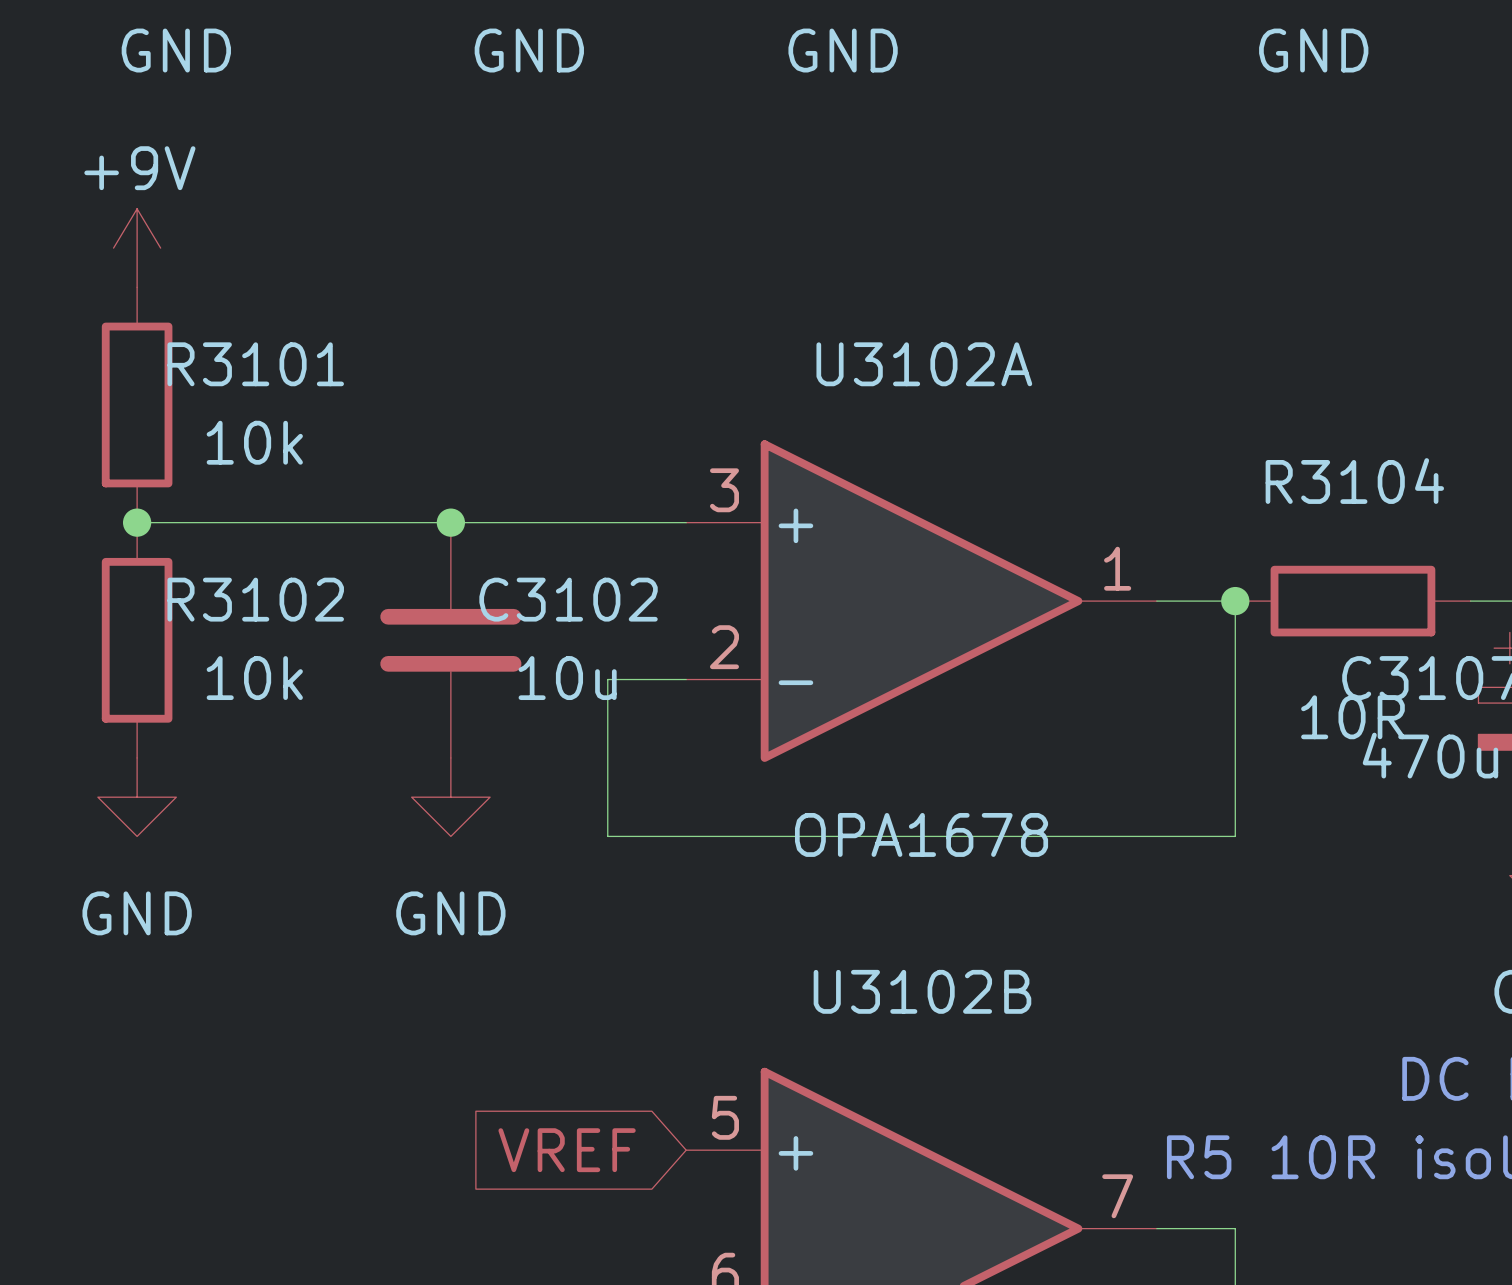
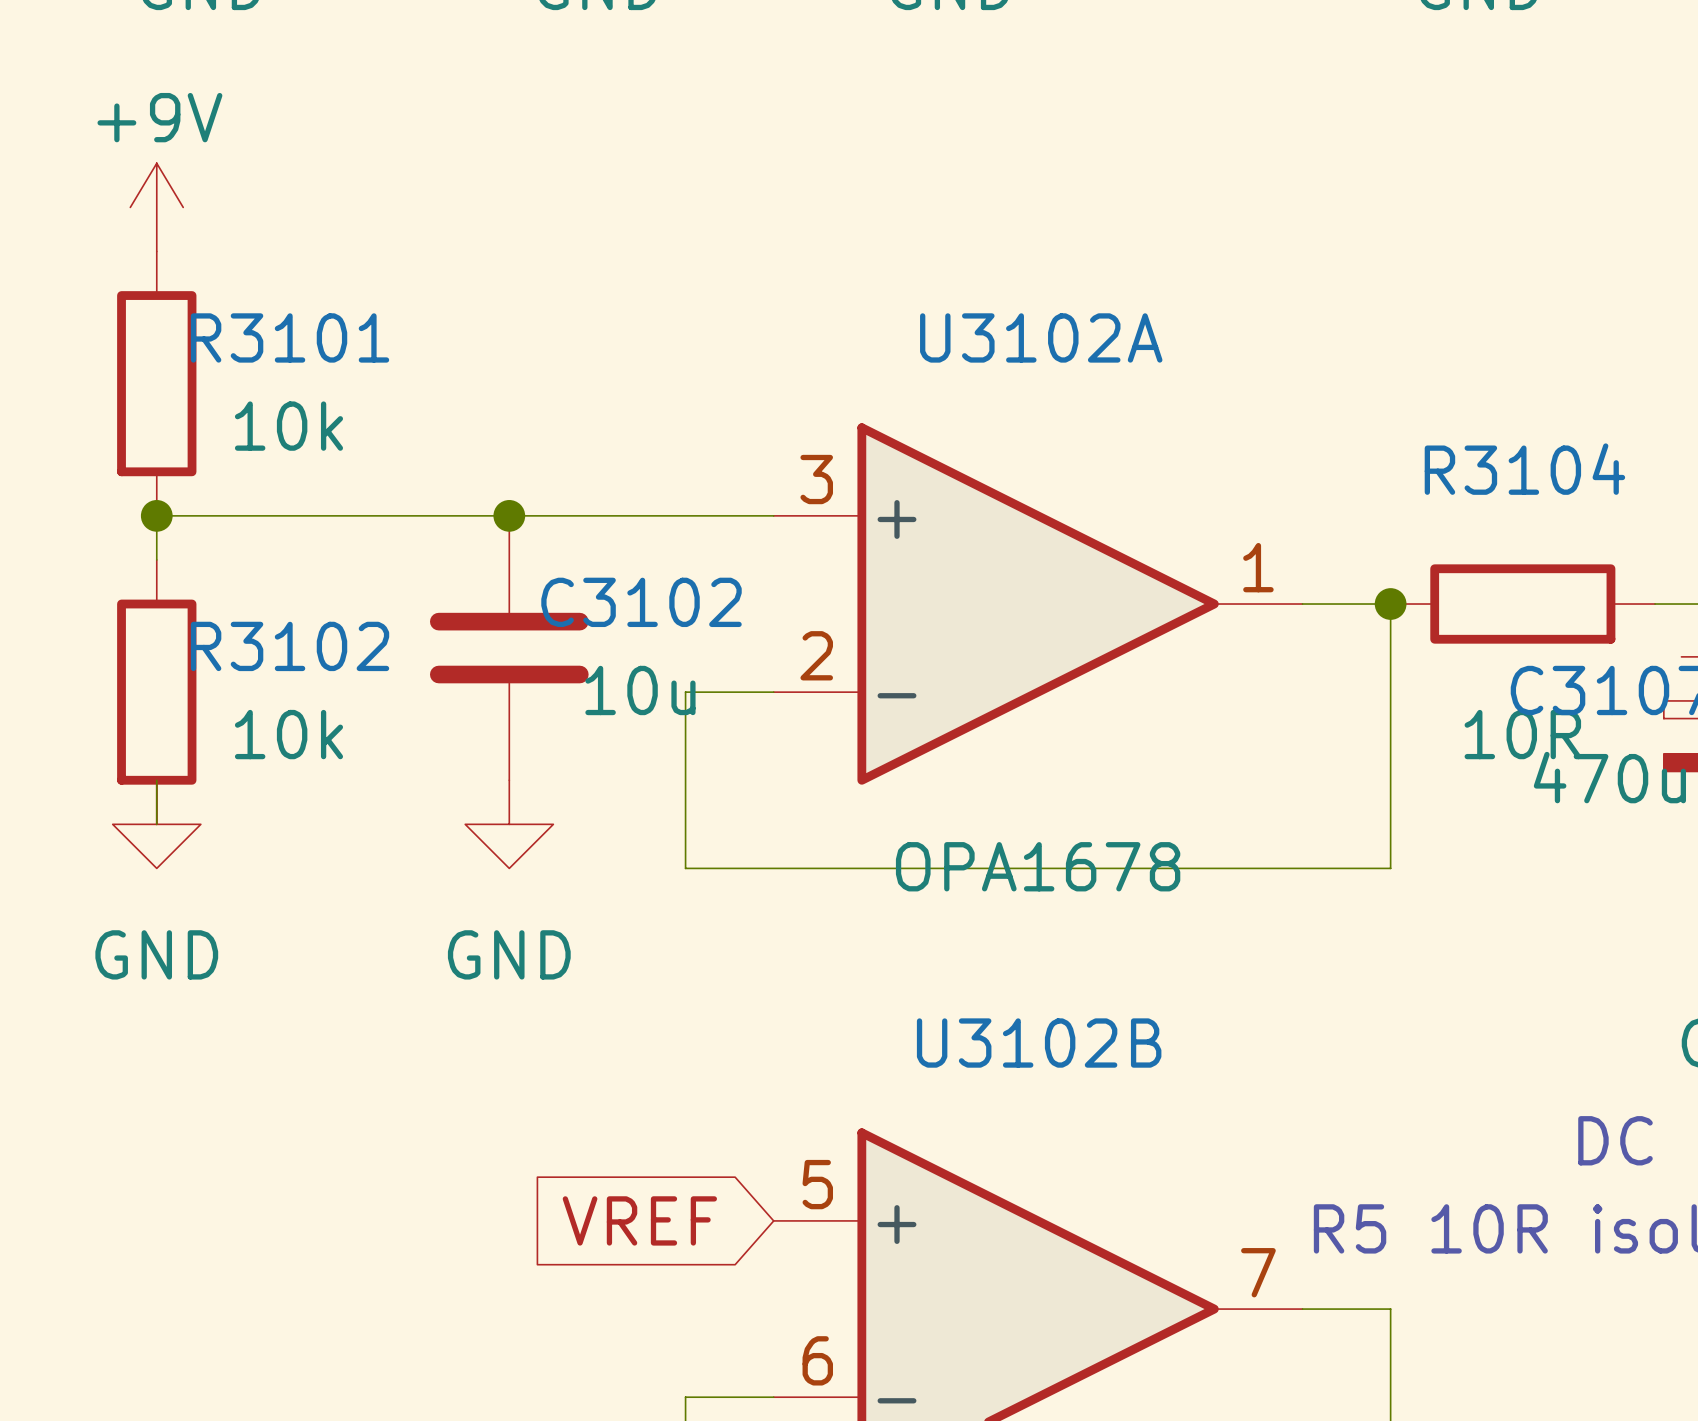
R3102 position: (137, 640) -> (156, 692)

